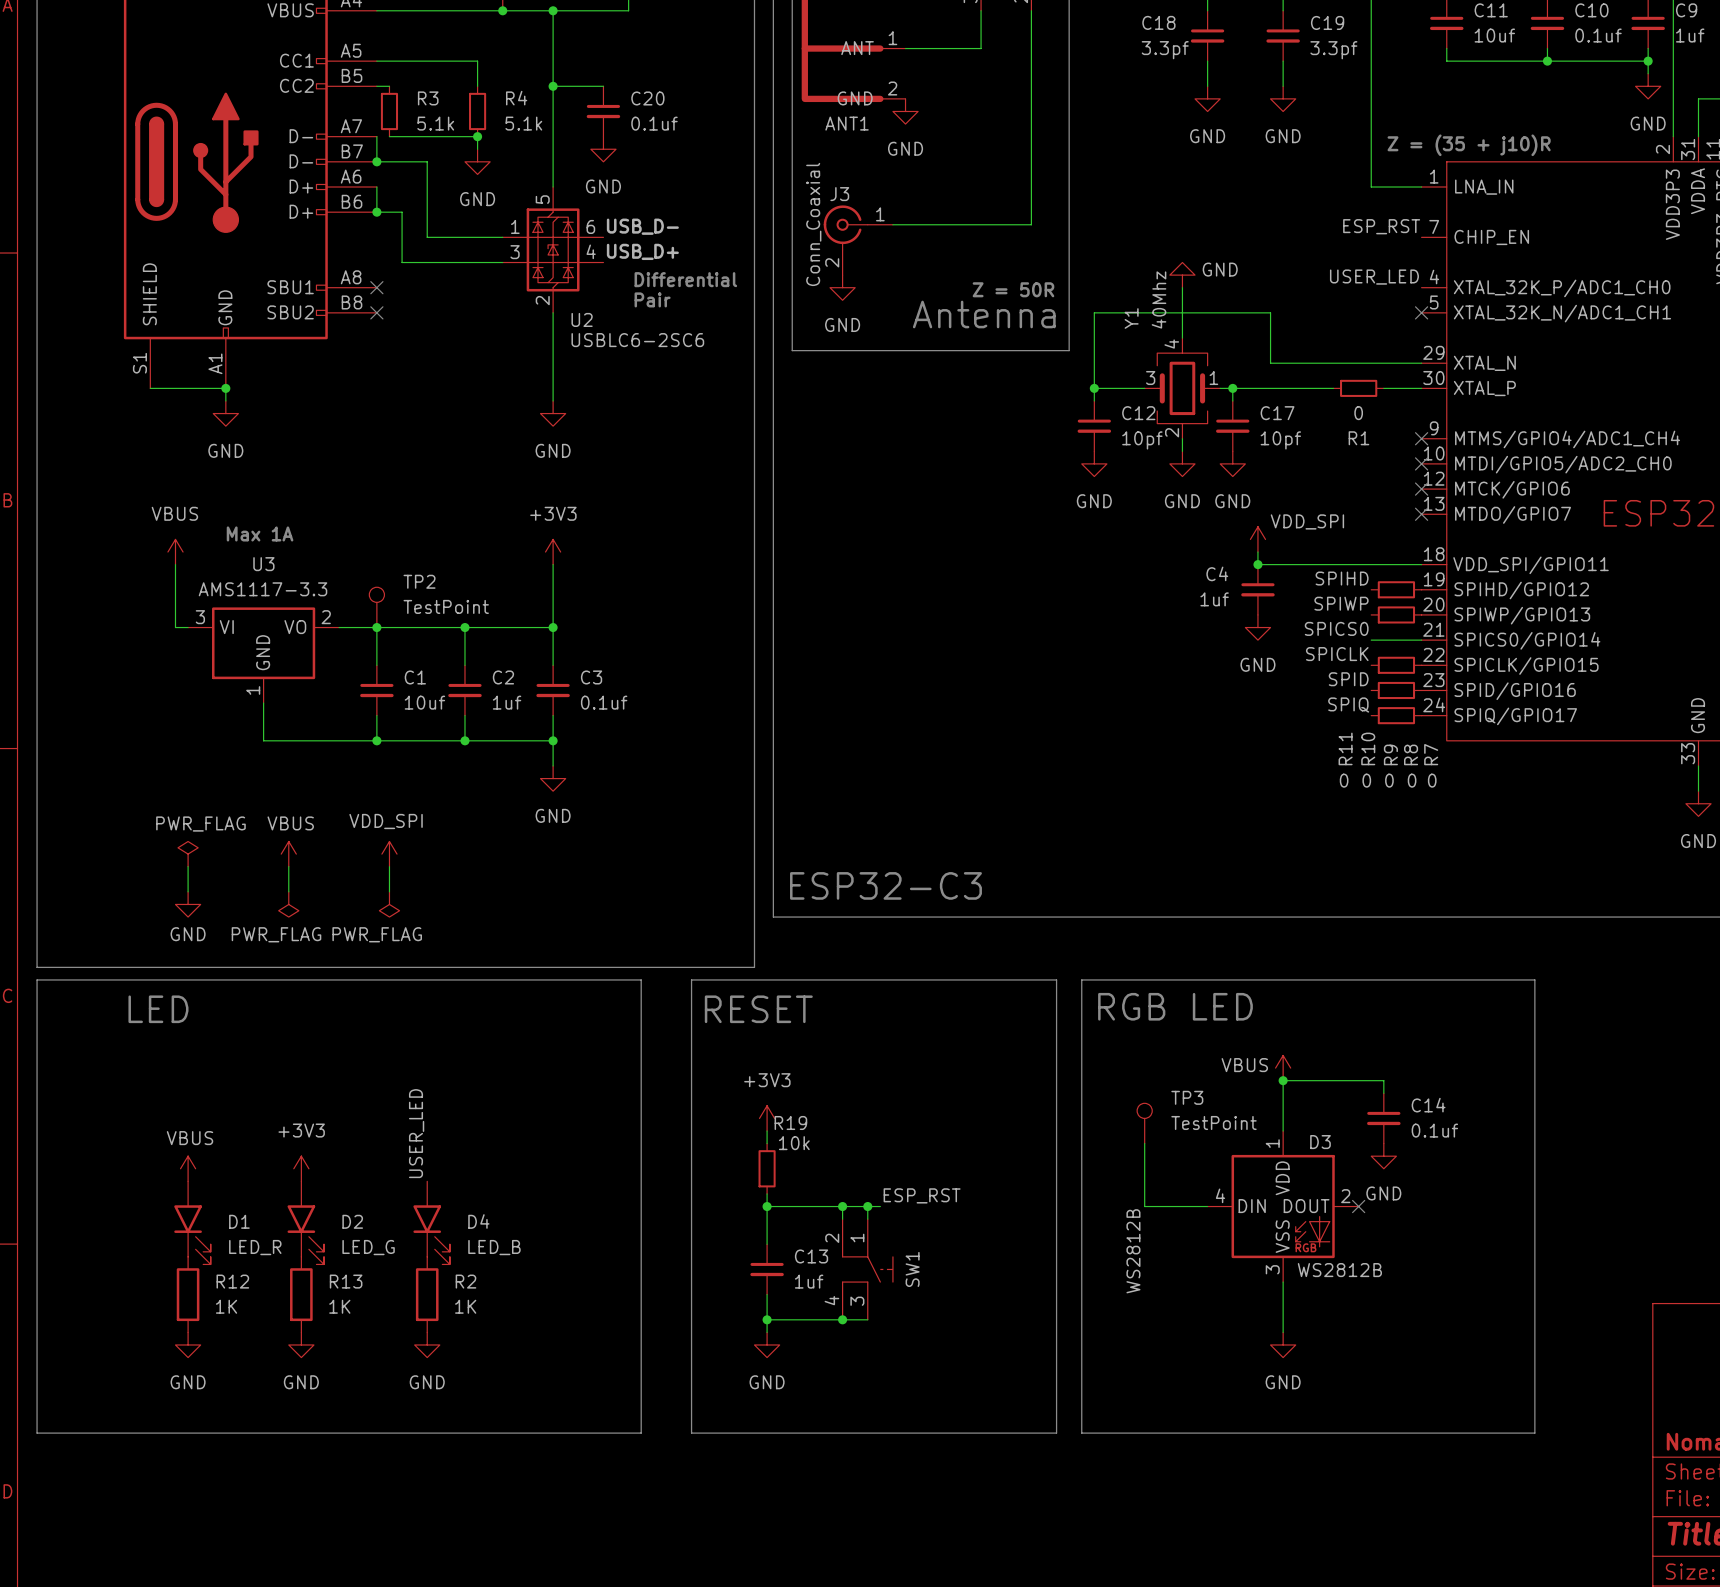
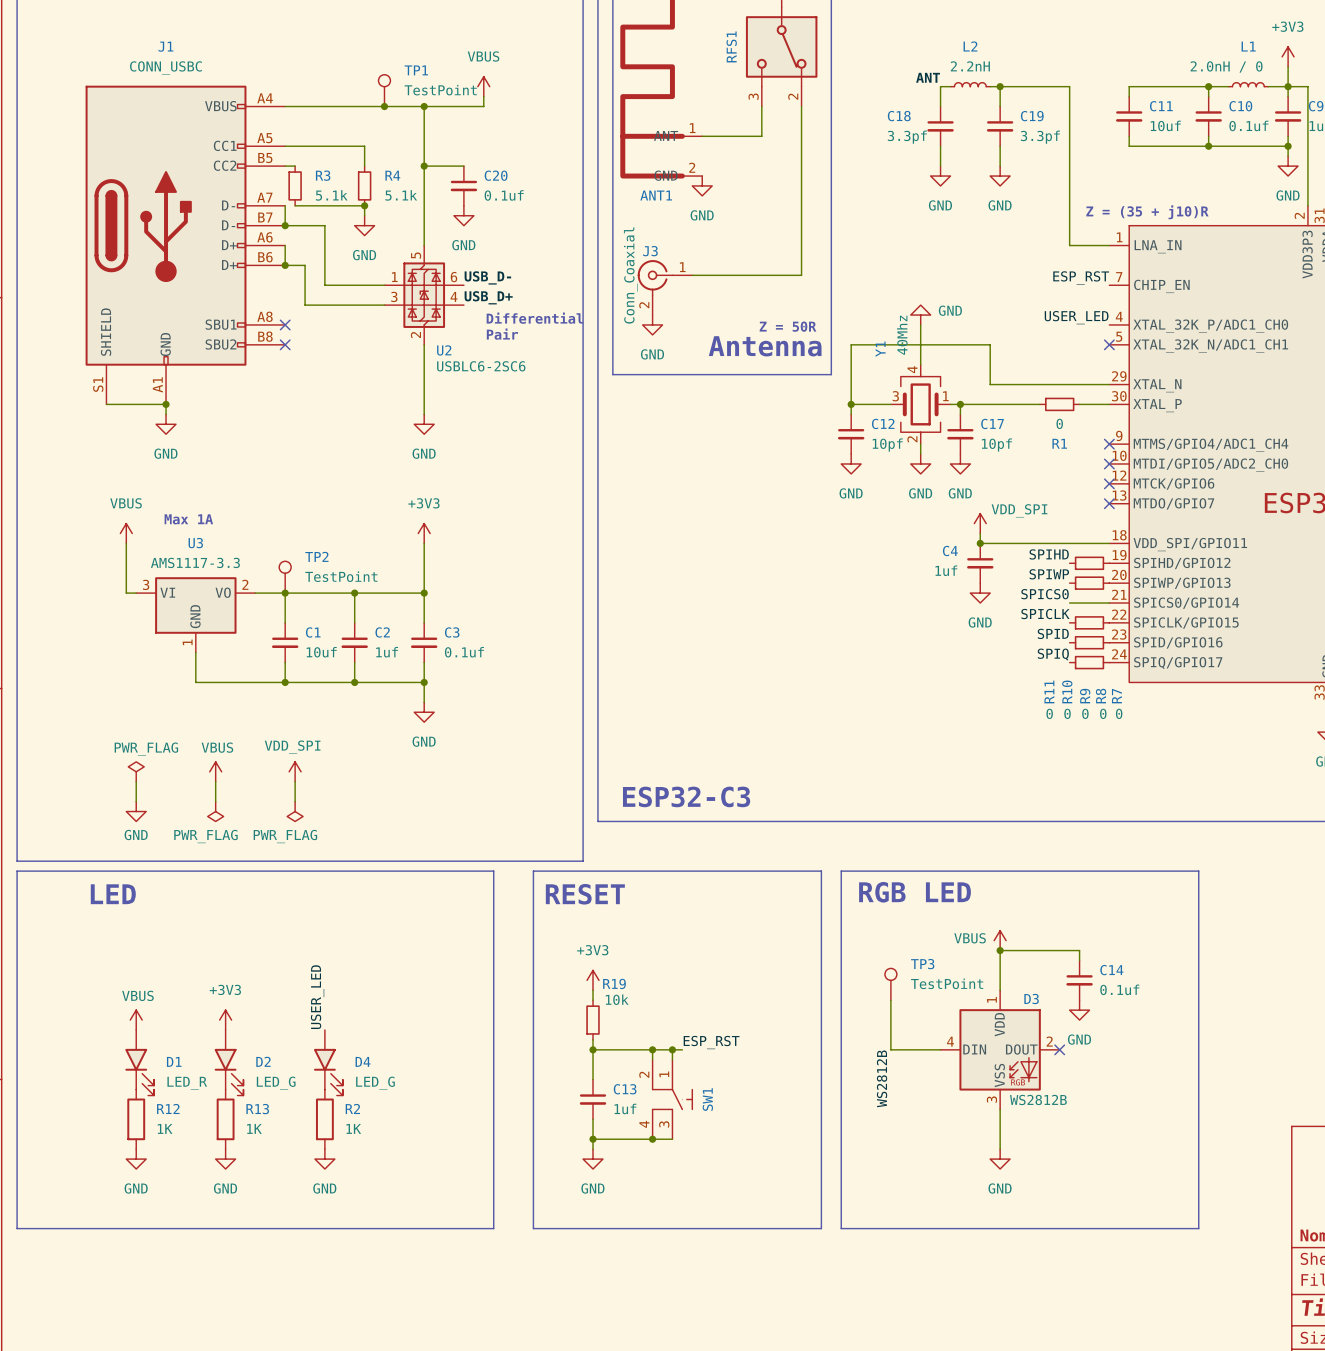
D4 value: LED_B (494, 1247) -> LED_G (375, 1083)

